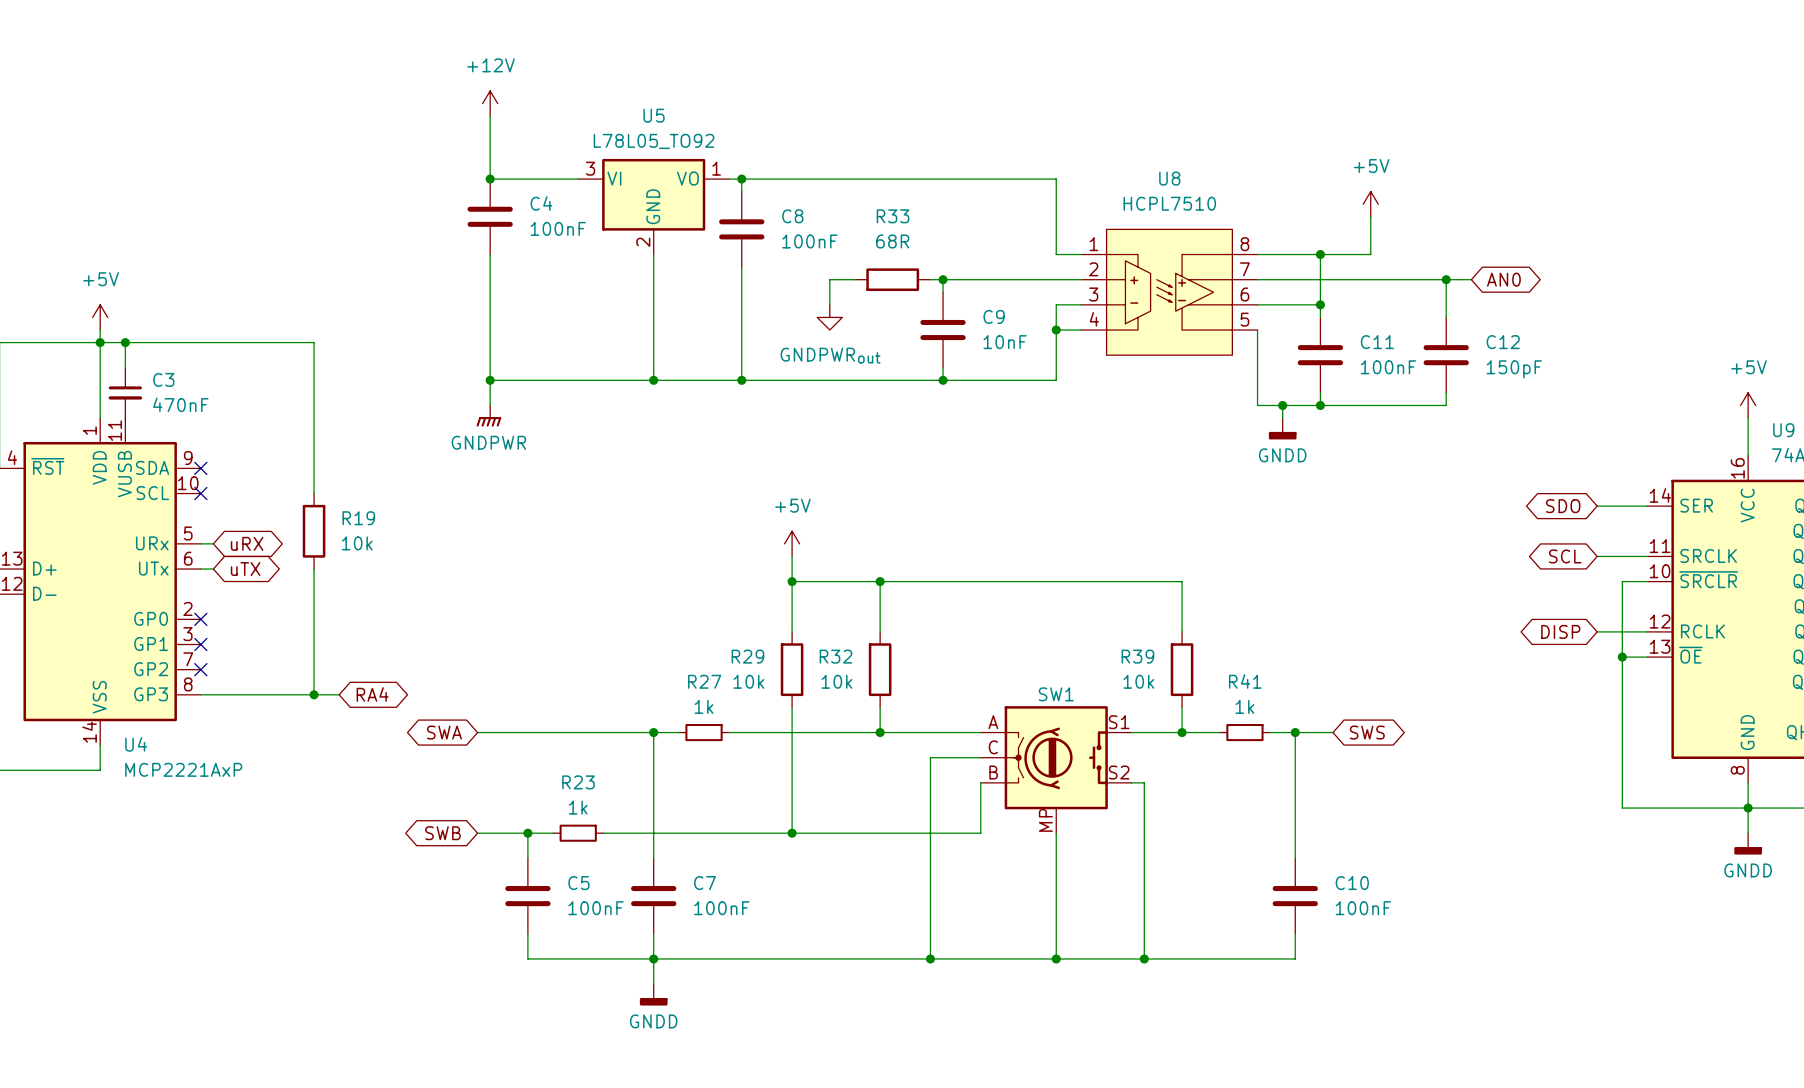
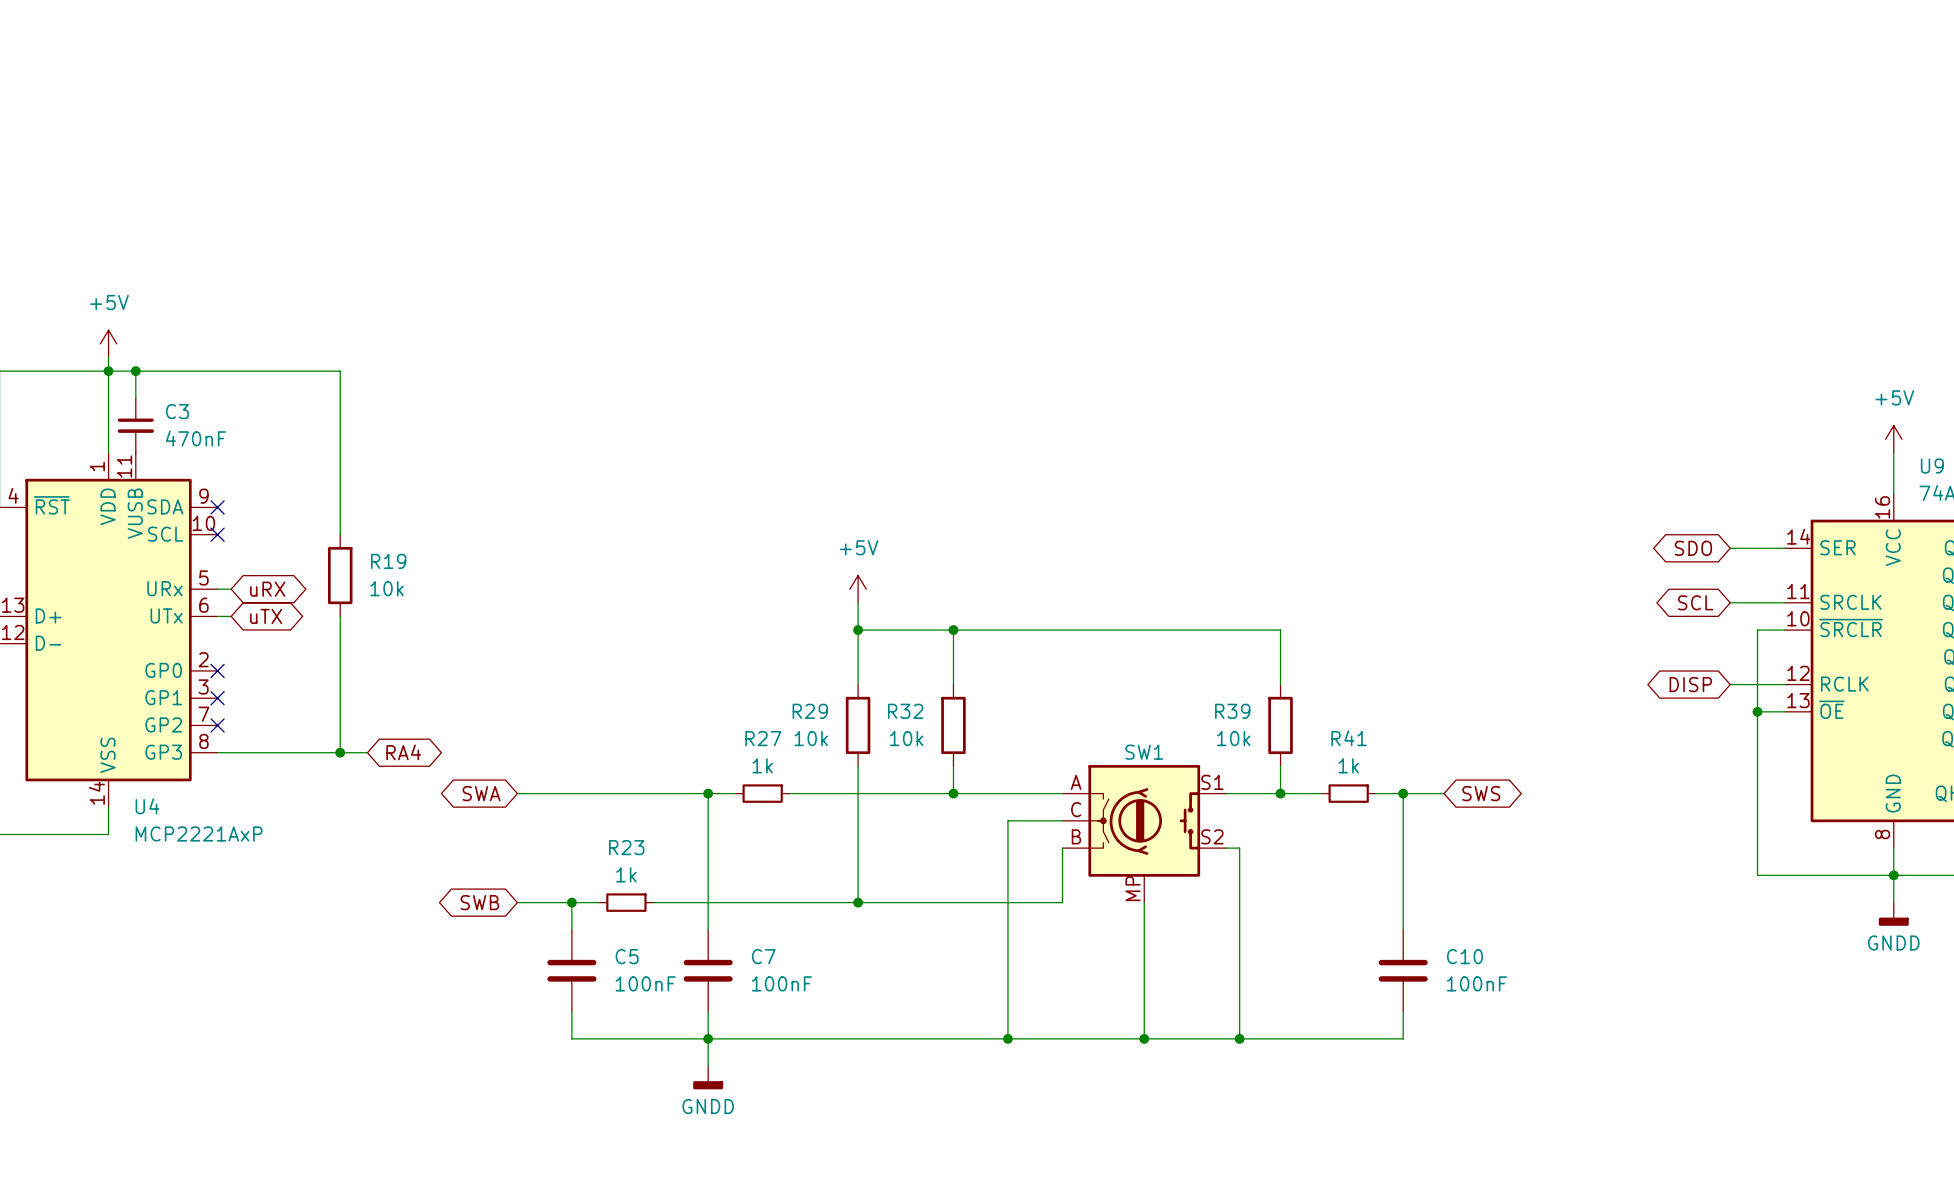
power symbol: +12V (490, 103) -> none
wire: (490, 116) (490, 179) (578, 179) -> none
junction: (490, 179) -> none
wire: (729, 179) (1056, 179) (1056, 254) (1081, 254) -> none
wire: (741, 179) (741, 191) -> none
junction: (741, 179) -> none
power symbol: +5V (1370, 204) -> none
U5: L78L05_TO92 (653, 206) -> none
C4: 100nF (490, 216) -> none
wire: (1370, 216) (1370, 254) (1257, 254) -> none
C8: 100nF (741, 229) -> none
wire: (490, 254) (490, 405) -> none
wire: (653, 254) (653, 380) -> none
wire: (1320, 254) (1320, 317) -> none
junction: (1320, 254) -> none
wire: (741, 267) (741, 380) -> none
wire: (854, 279) (829, 279) (829, 304) -> none
R33: 68R (892, 279) -> none
wire: (930, 279) (1081, 279) -> none
wire: (943, 279) (943, 292) -> none
junction: (943, 279) -> none
wire: (1257, 279) (1471, 279) -> none
wire: (1446, 279) (1446, 317) -> none
junction: (1446, 279) -> none
global label: AN0 (1503, 279) -> none
U8: HCPL7510 (1169, 292) -> none
wire: (1081, 304) (1056, 304) (1056, 380) (490, 380) -> none
wire: (1257, 304) (1320, 304) -> none
junction: (1320, 304) -> none
power symbol: GNDPWRout (829, 317) -> none
C9: 10nF (943, 330) -> none
wire: (1056, 330) (1081, 330) -> none
junction: (1056, 330) -> none
wire: (1257, 330) (1257, 405) (1446, 405) (1446, 392) -> none
C11: 100nF (1320, 355) -> none
C12: 150pF (1446, 355) -> none
wire: (943, 367) (943, 380) -> none
junction: (490, 380) -> none
junction: (653, 380) -> none
junction: (741, 380) -> none
junction: (943, 380) -> none
wire: (1320, 392) (1320, 405) -> none
wire: (1282, 405) (1282, 418) -> none
junction: (1282, 405) -> none
junction: (1320, 405) -> none
power symbol: GNDPWR (488, 416) -> none
power symbol: GNDD (1282, 428) -> none

